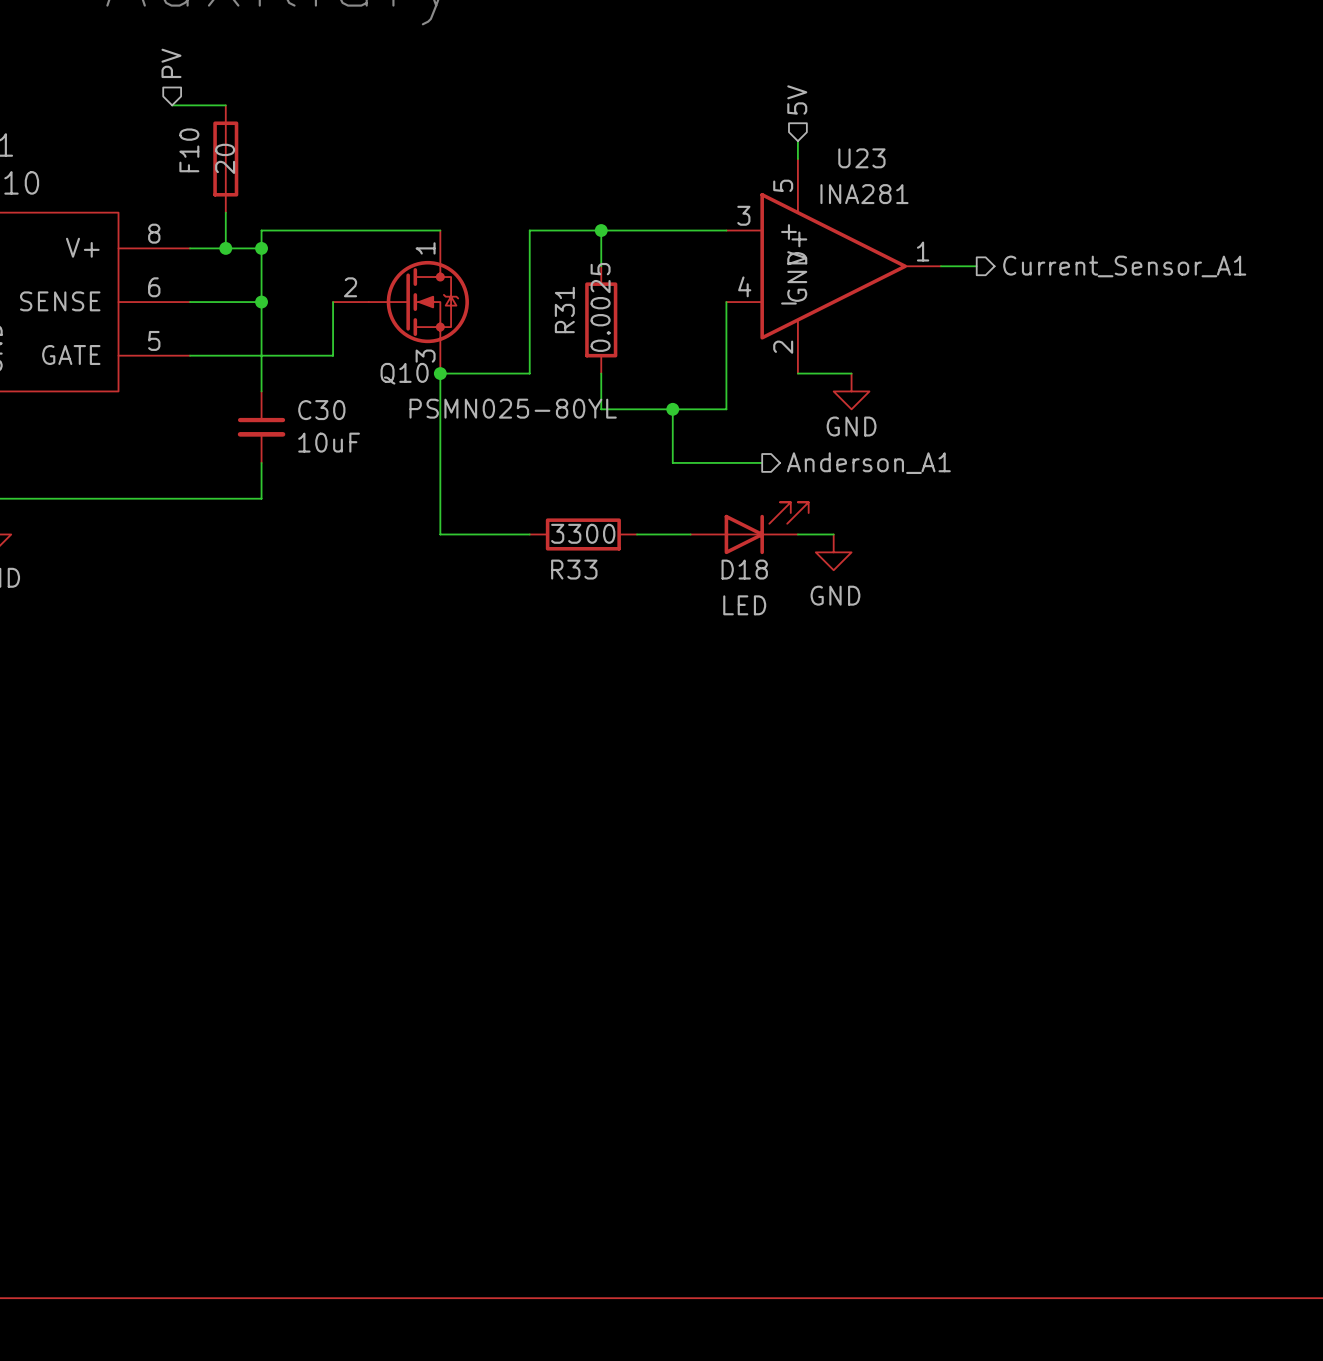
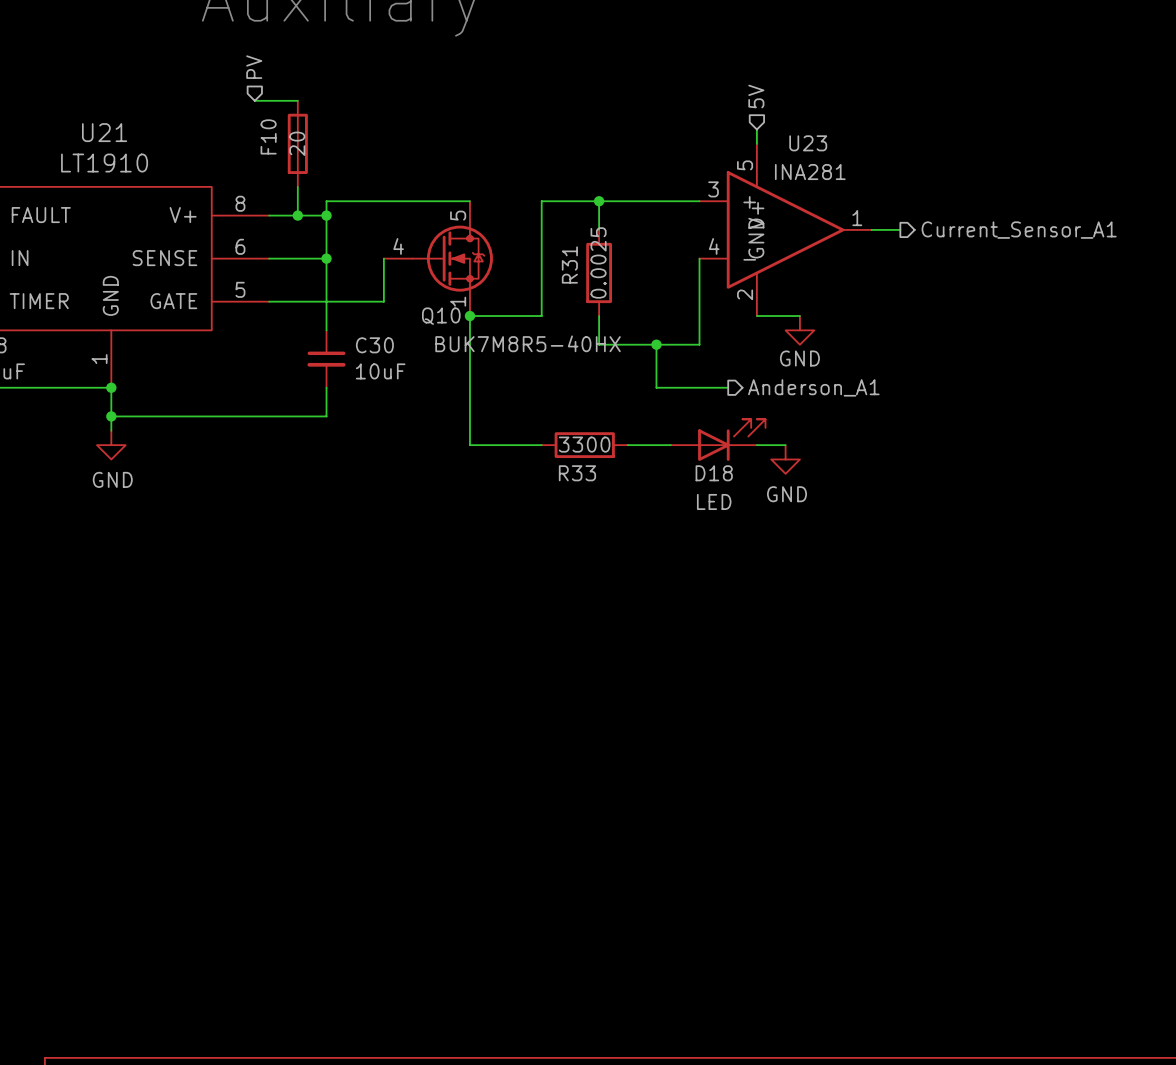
Q10 pin number: 1 (425, 248) -> 5 (458, 215)
Q10 pin number: 2 (350, 287) -> 4 (398, 246)
Q10 pin number: 3 (425, 356) -> 1 (458, 301)
Q10 value: PSMN025-80YL (513, 408) -> BUK7M8R5-40HX (528, 343)

